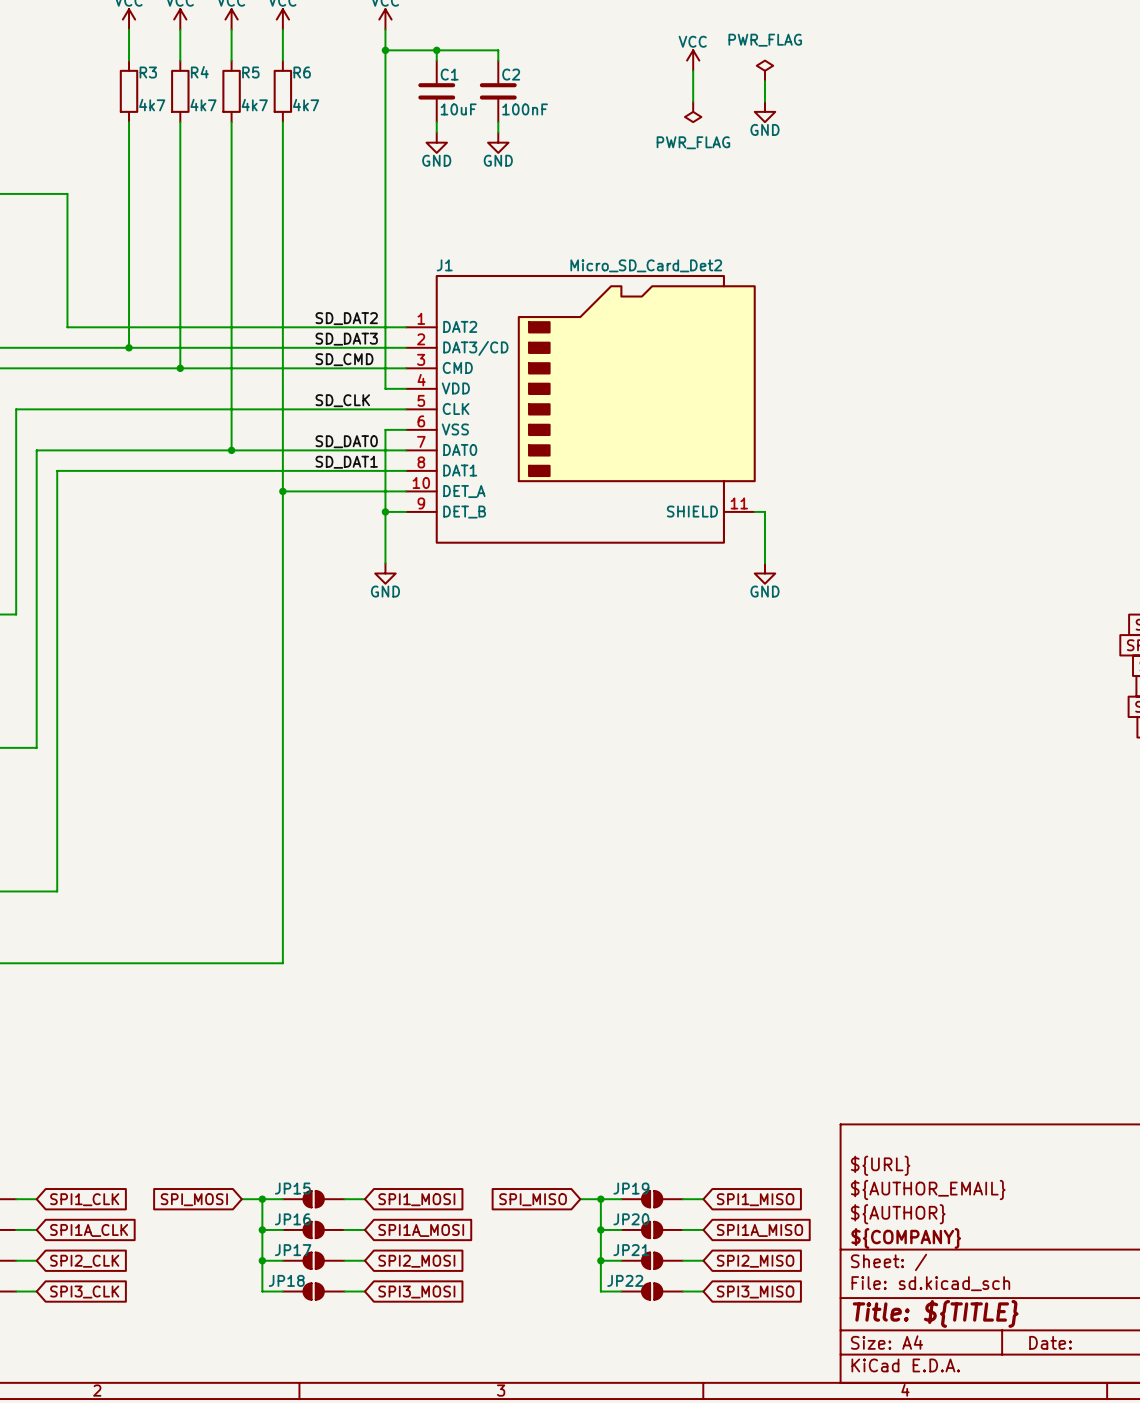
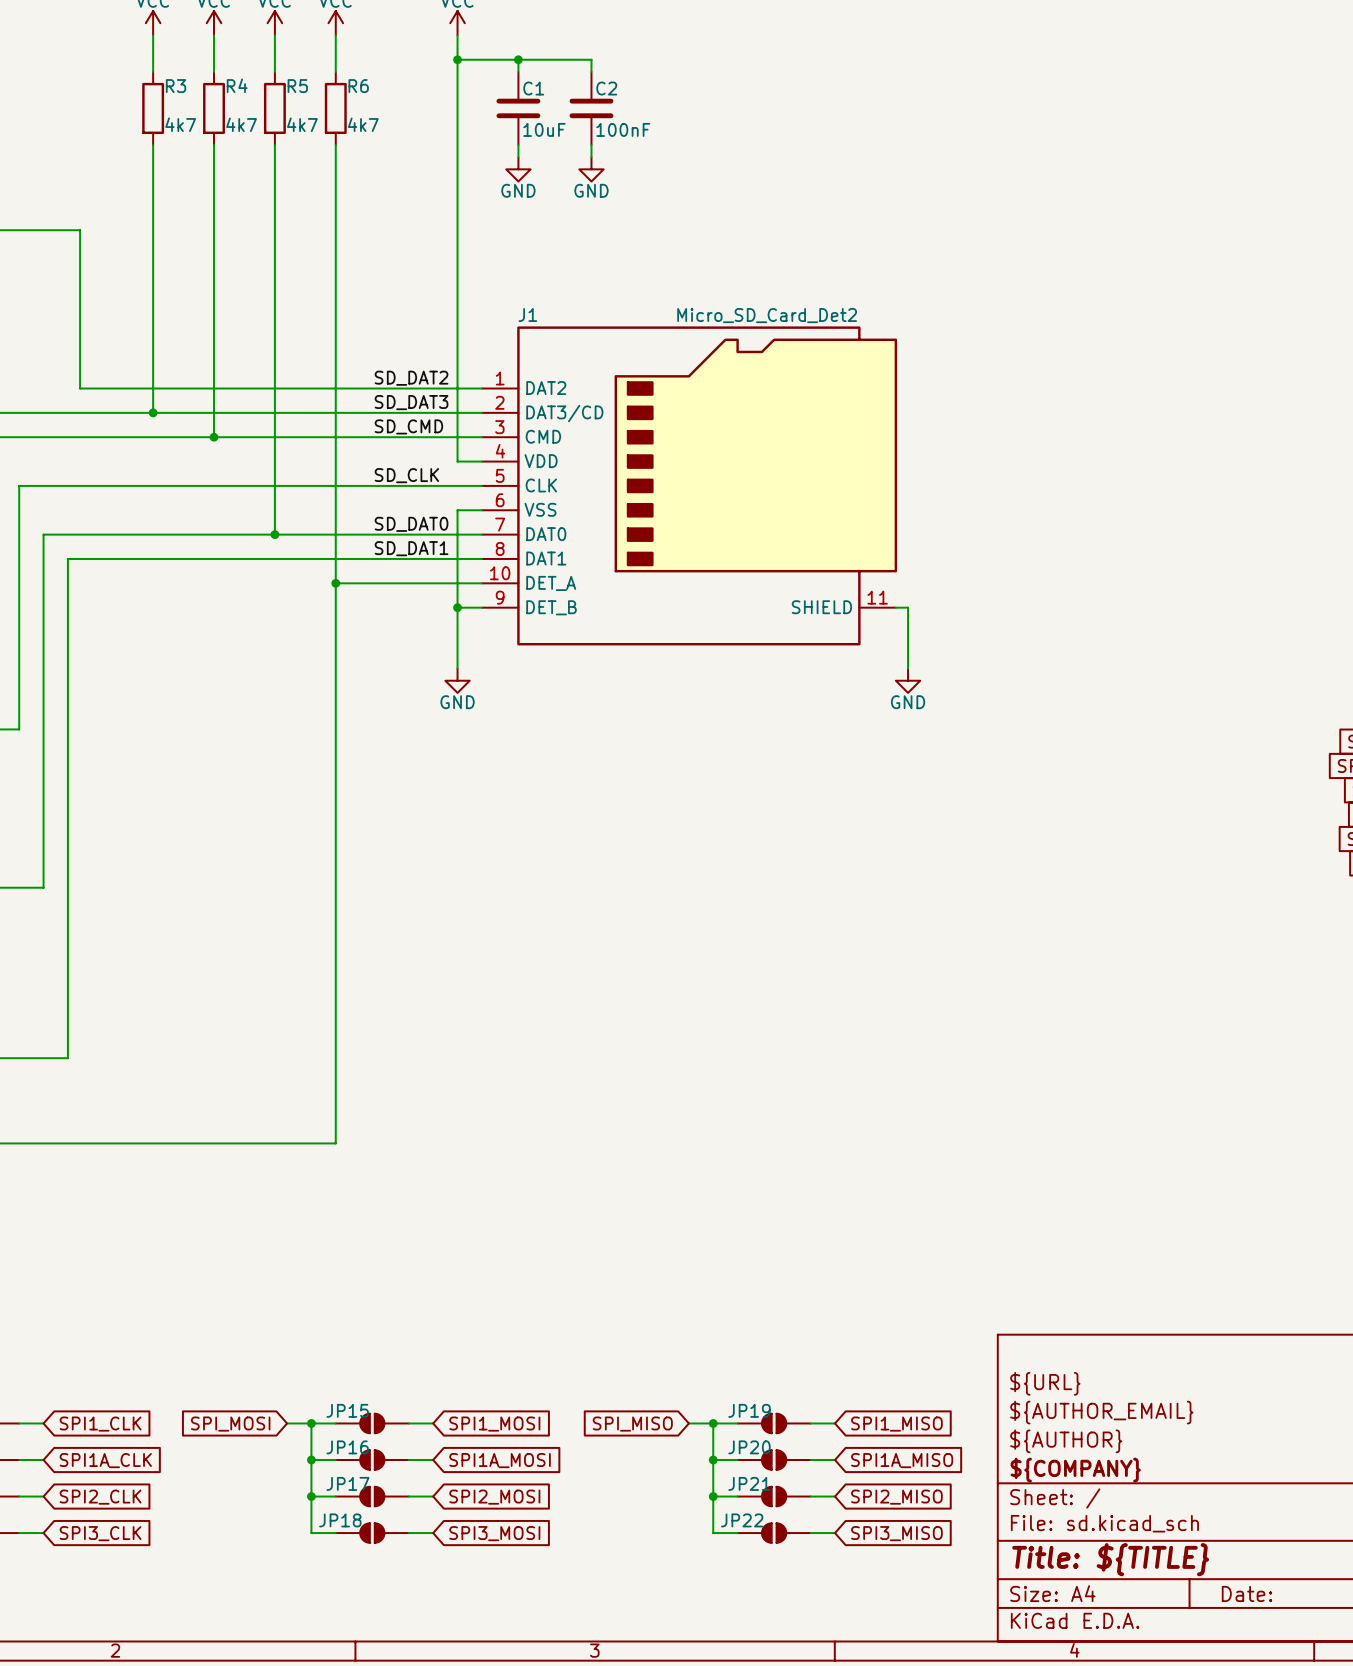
power symbol: VCC (693, 60) -> none
wire: (693, 70) (693, 101) -> none
power symbol: PWR_FLAG (764, 70) -> none
wire: (764, 81) (764, 101) -> none
power symbol: PWR_FLAG (693, 111) -> none
power symbol: GND (764, 111) -> none

